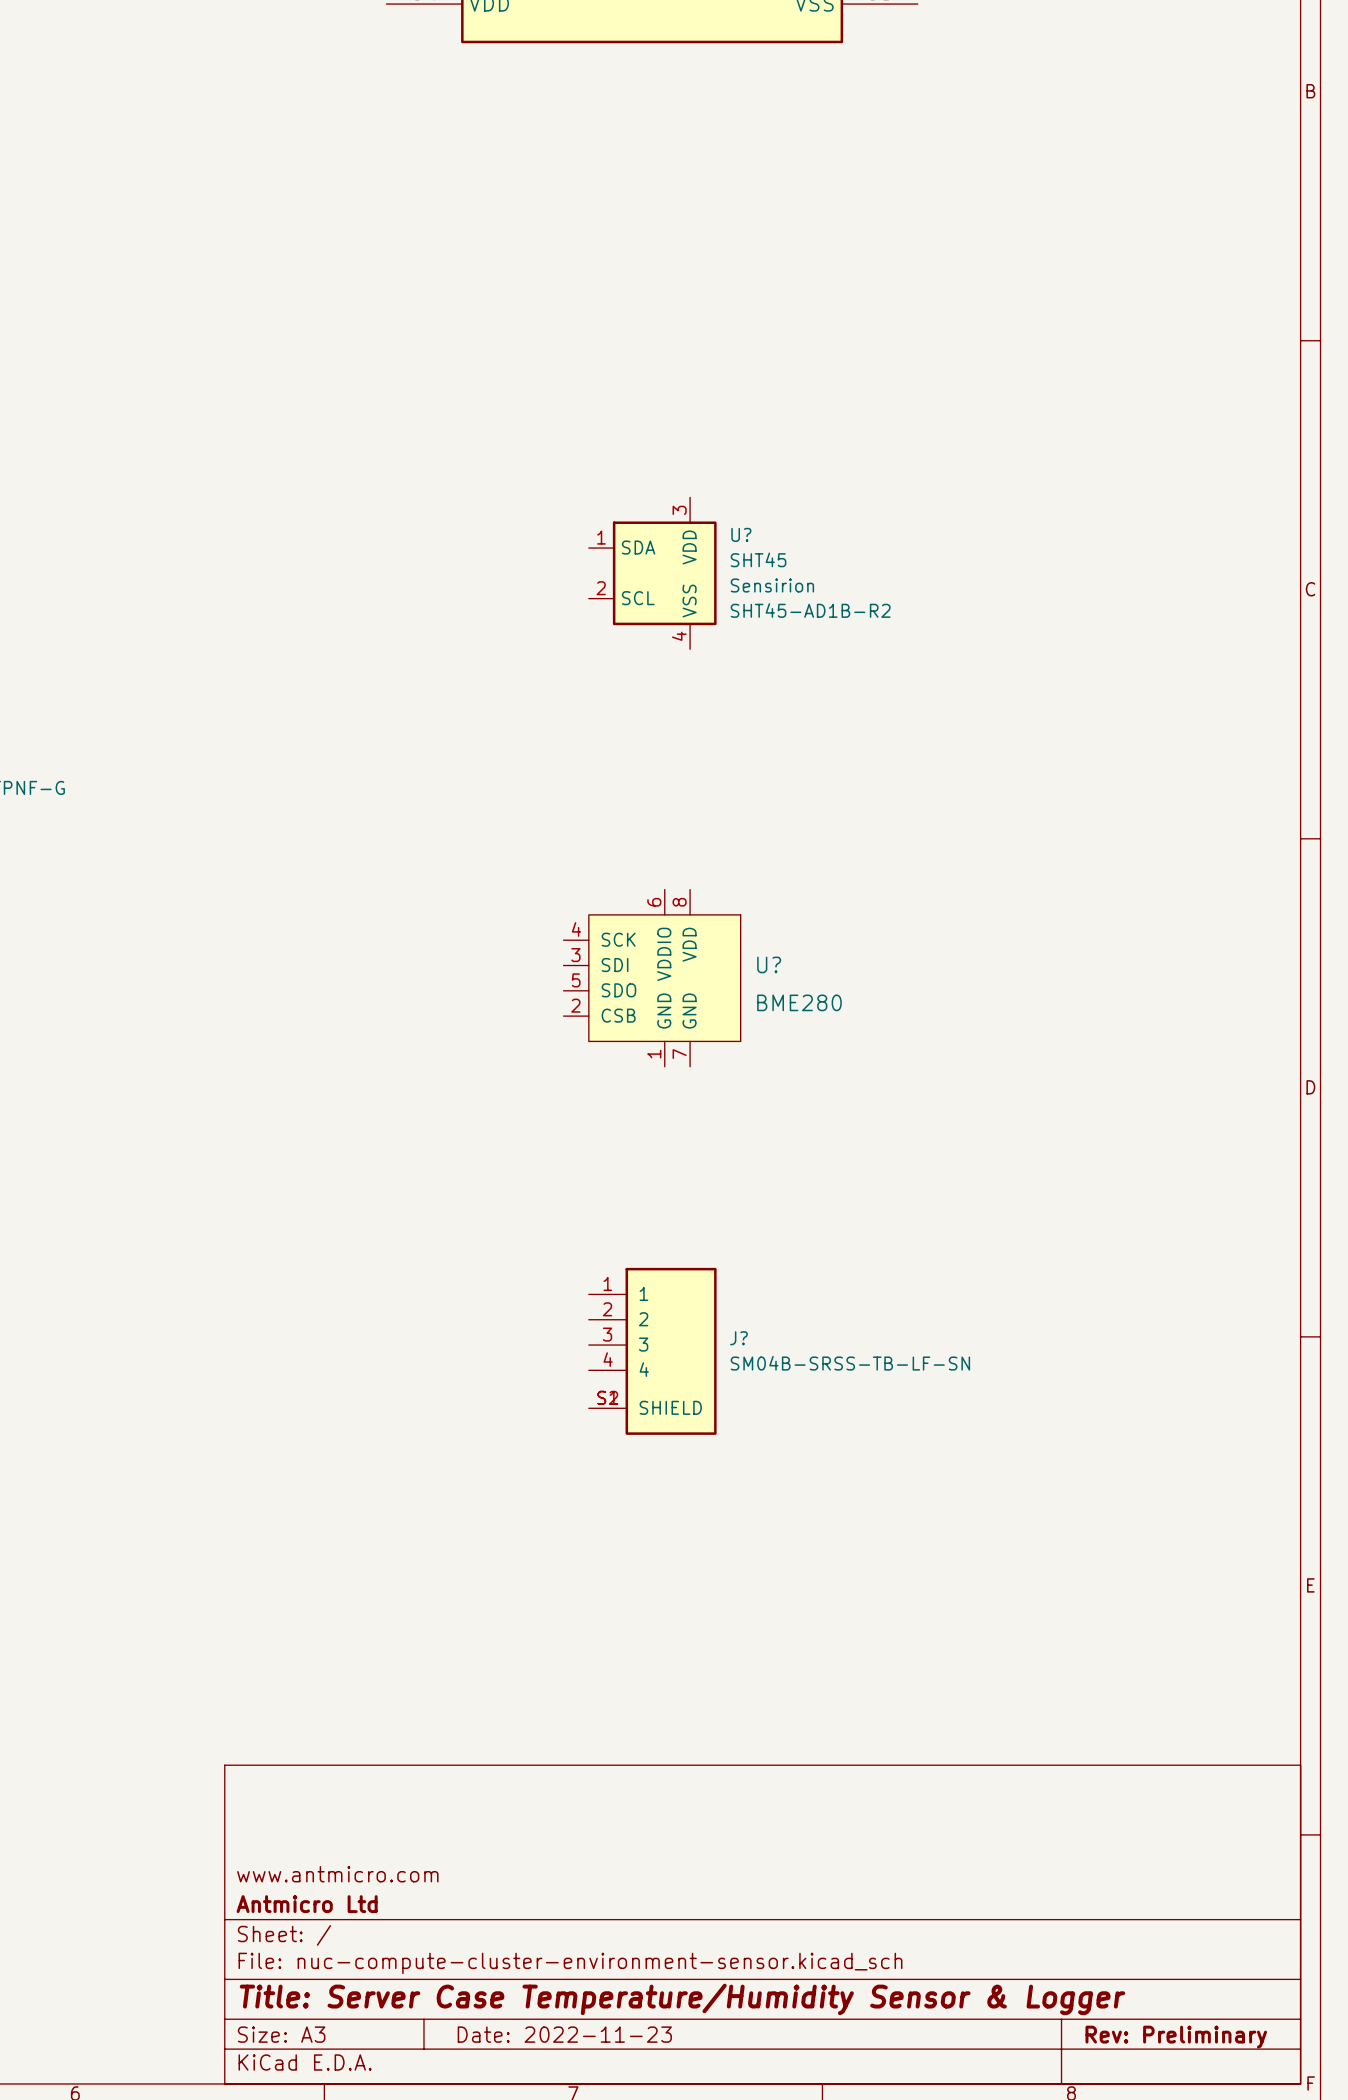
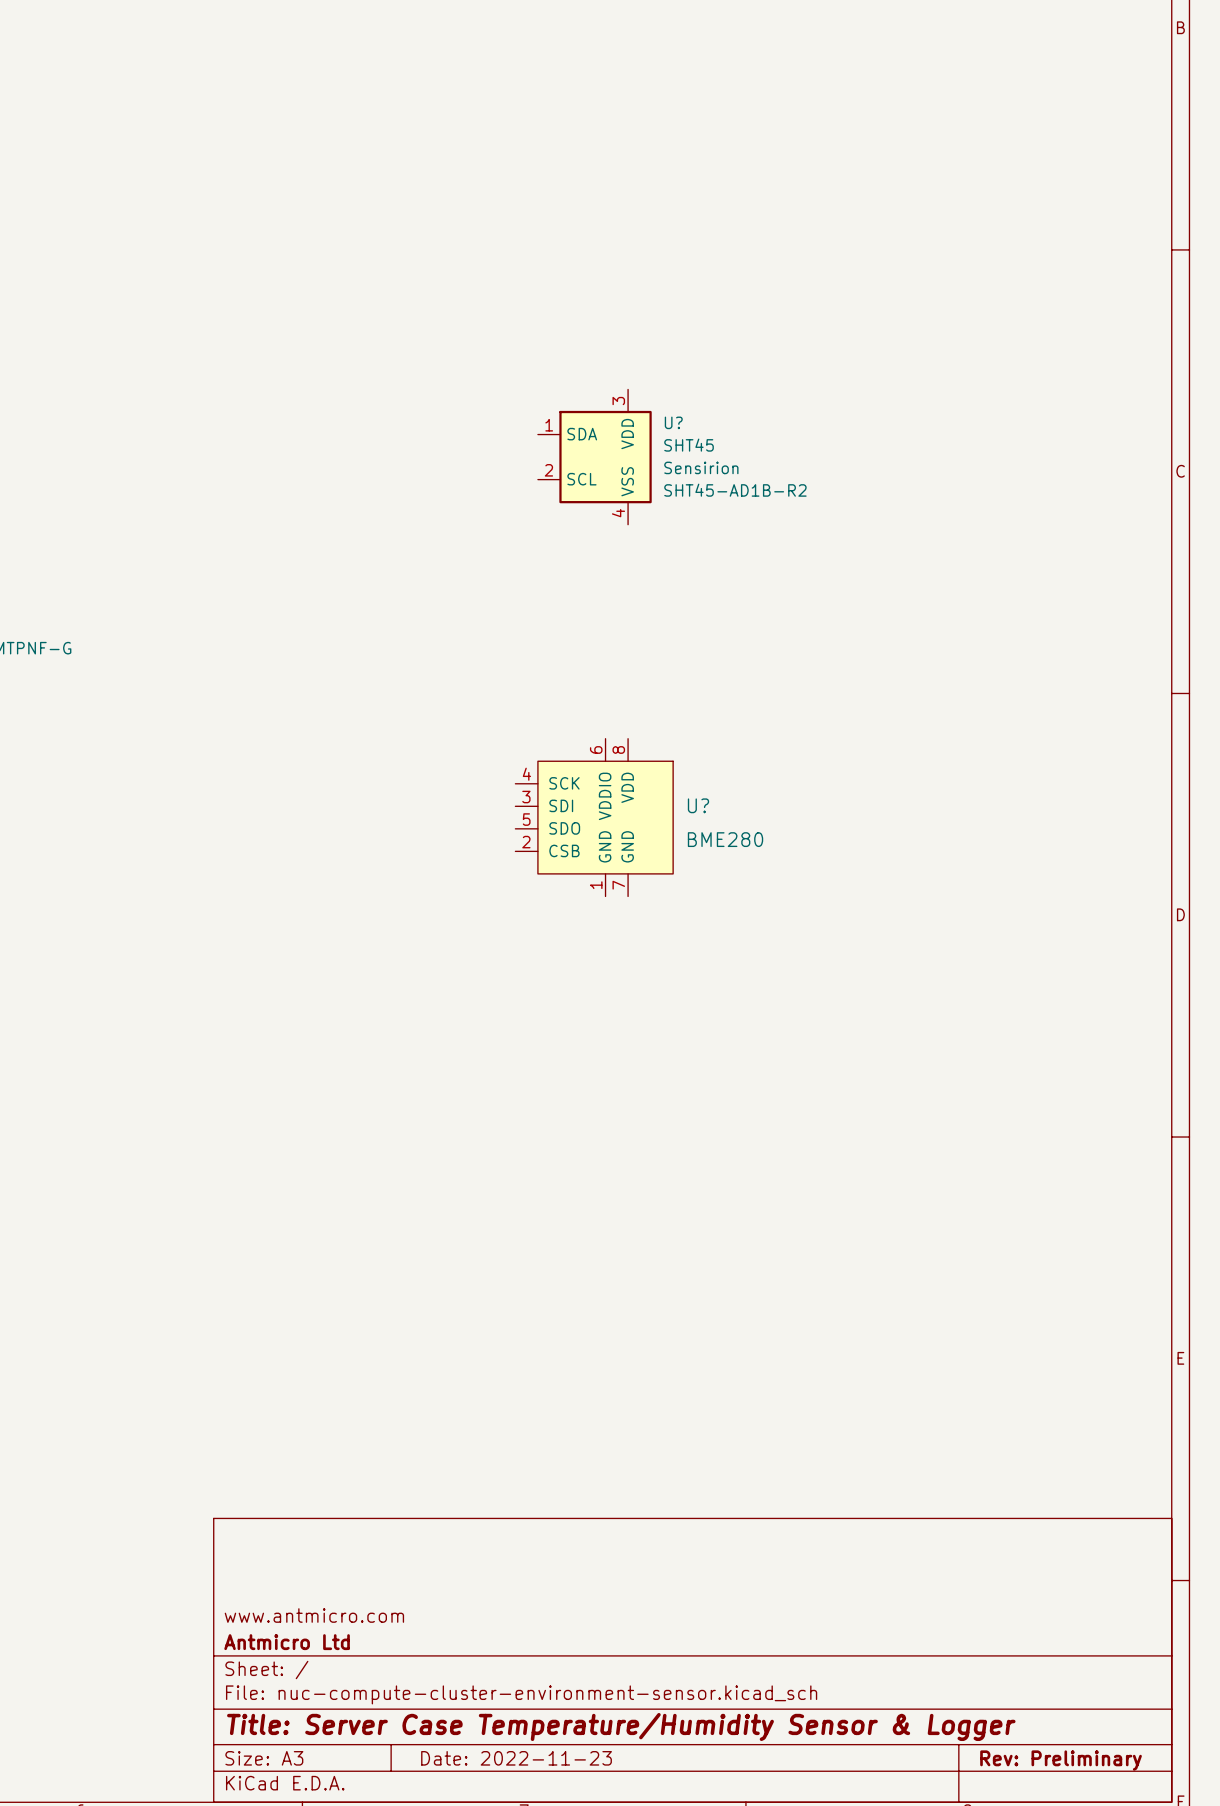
J?: SM04B-SRSS-TB-LF-SN (652, 1351) -> none

